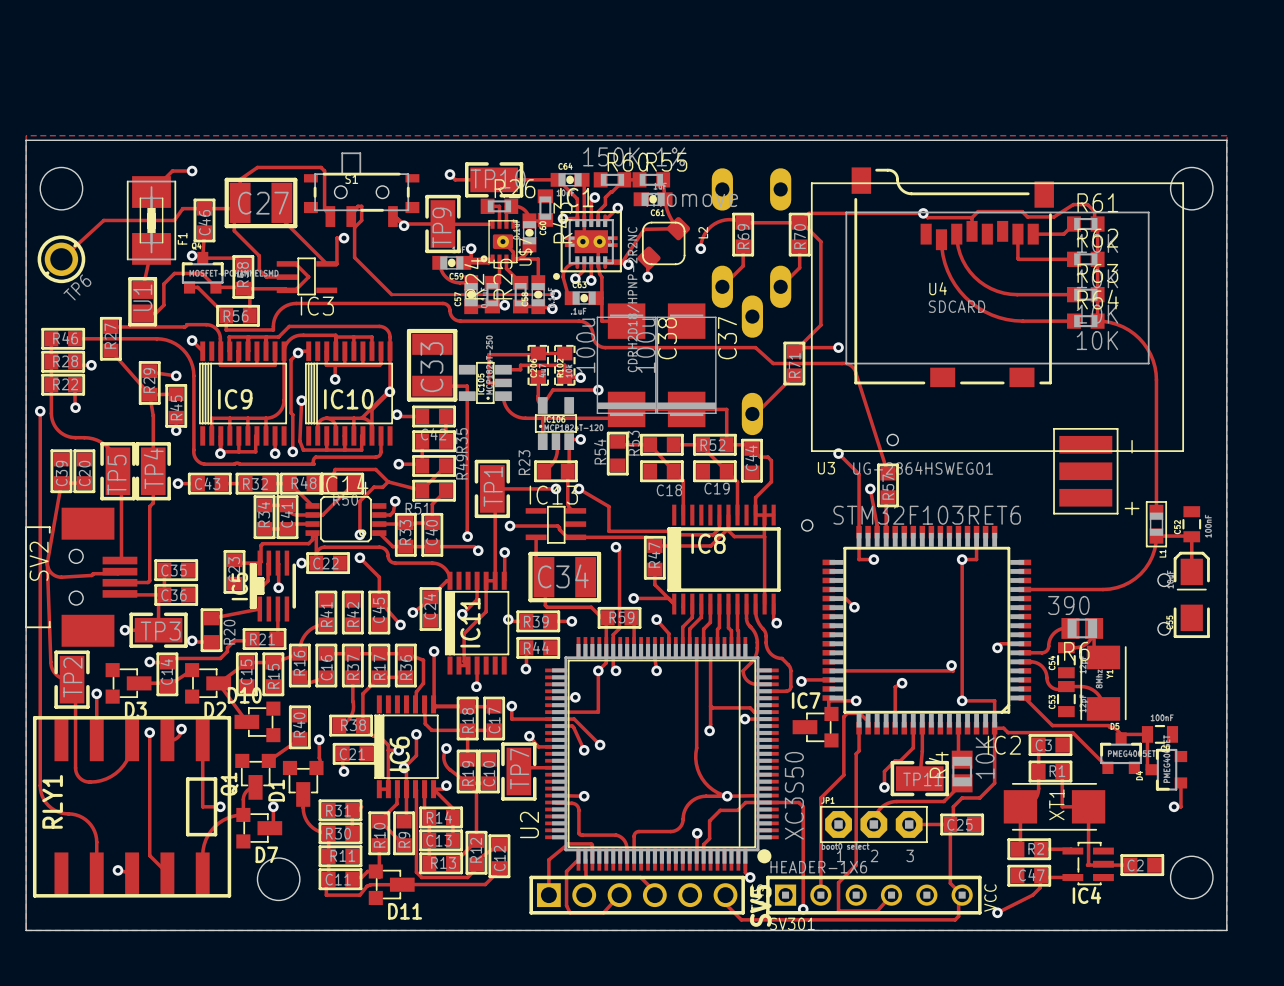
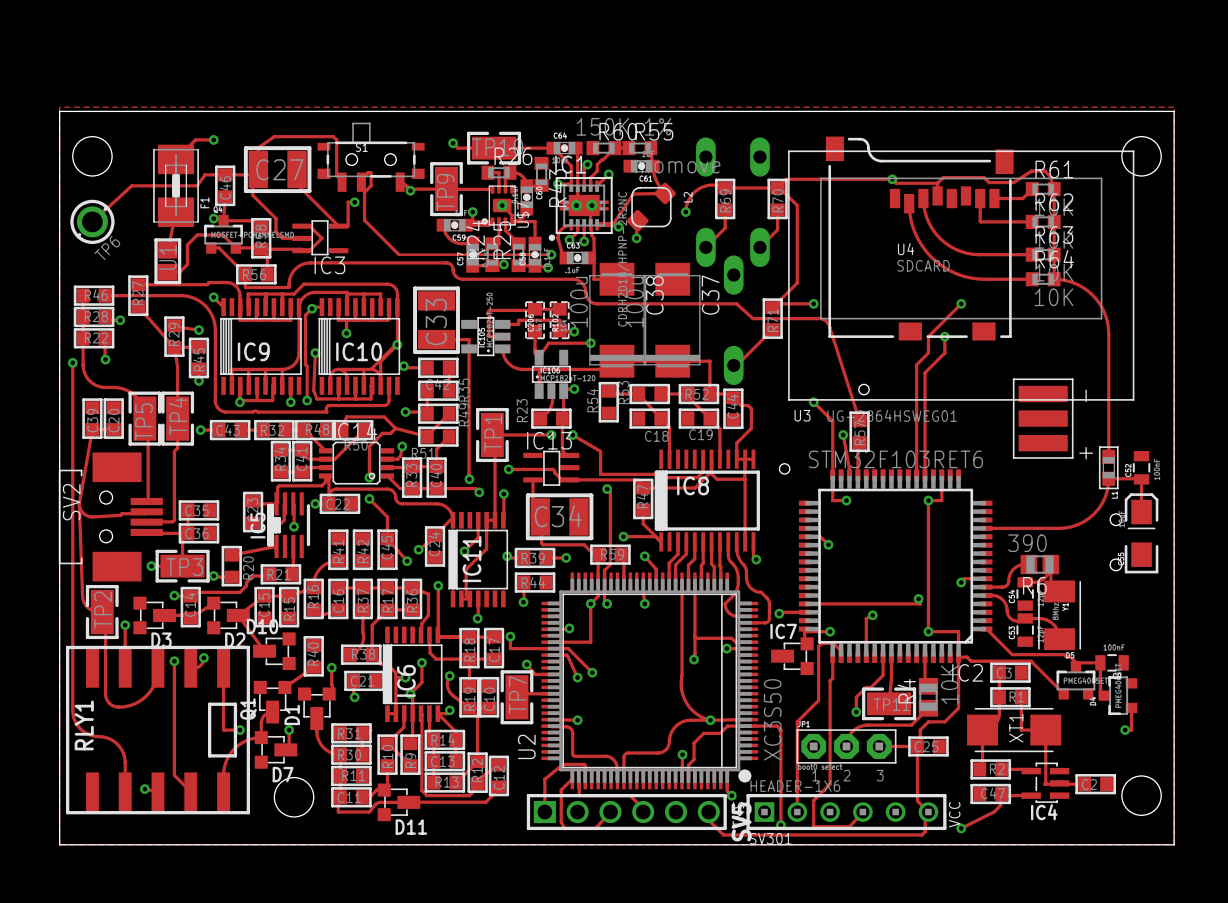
track: none -> (961, 303) (928, 336) (928, 353) (916, 364) (916, 475)
via: none -> (961, 303)
track: none -> (944, 336) (944, 353) (925, 372) (925, 475)
via: none -> (944, 336)

